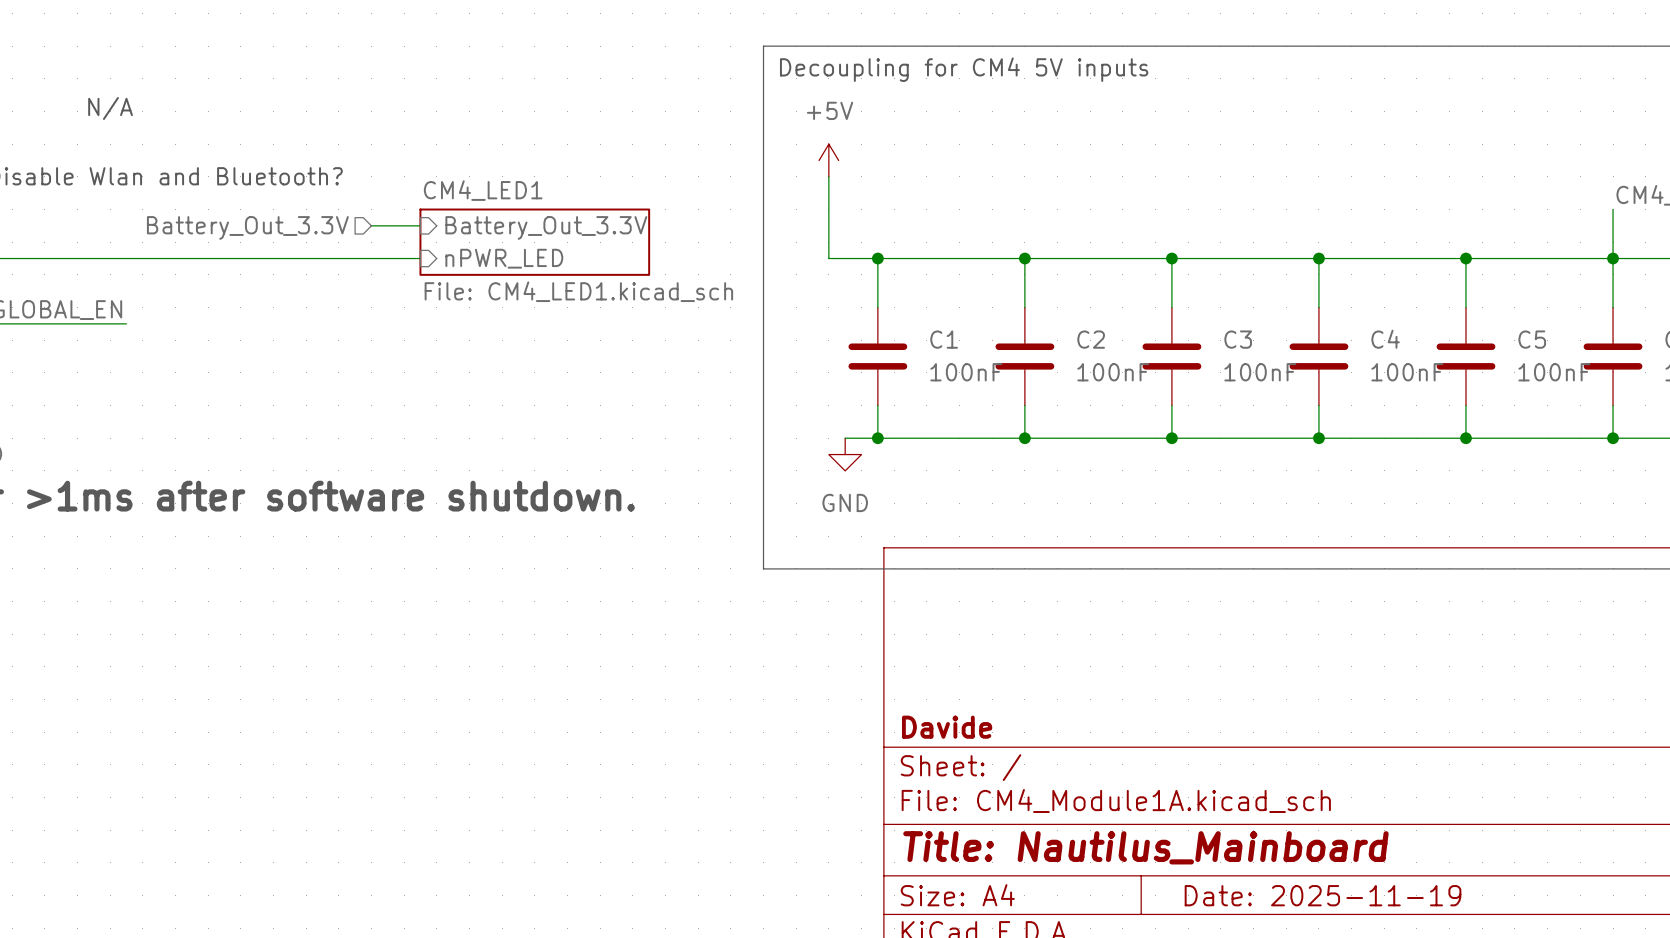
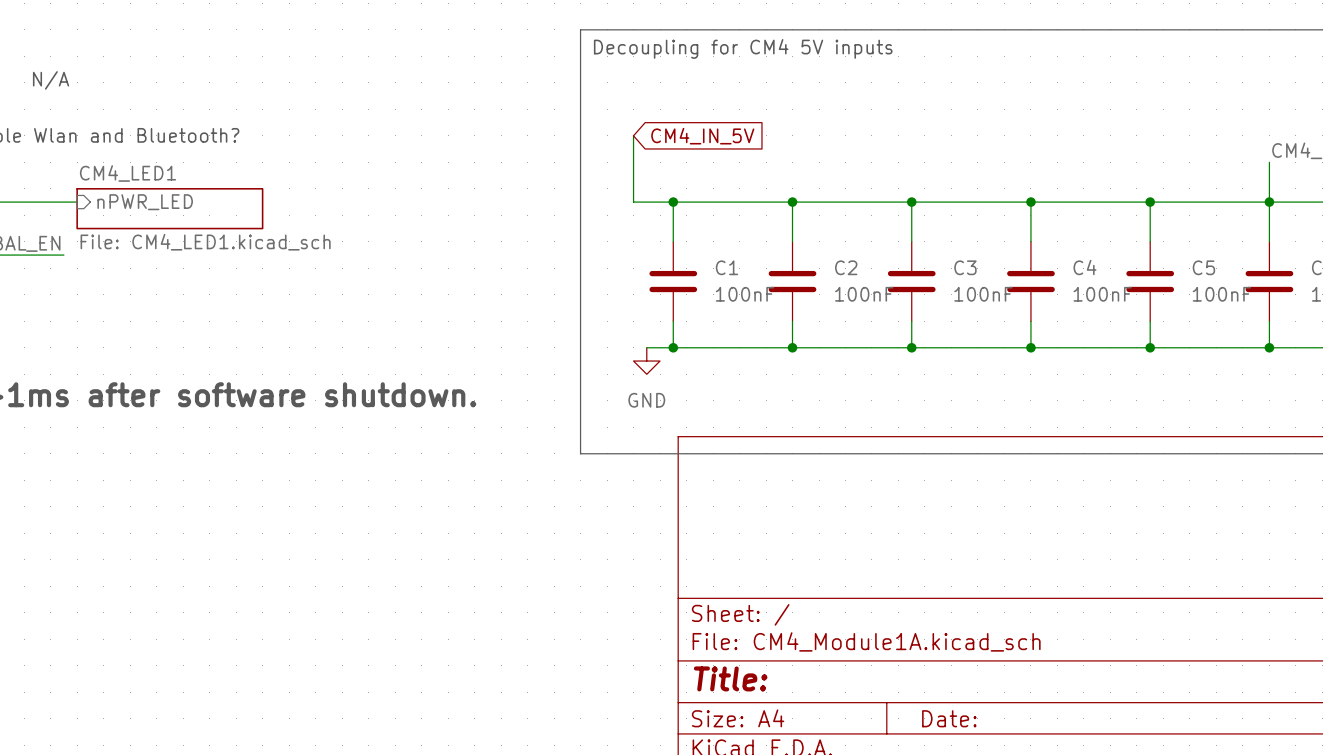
power symbol: +5V (828, 160) -> none
global label: none -> CM4_IN_5V (702, 136)
sheet CM4_LED1 shape: [419, 208, 651, 276] -> [76, 188, 264, 230]
wire: (371, 225) (420, 225) -> none
hierarchical label: Battery_Out_3.3V (247, 227) -> none
sheet pin: Battery_Out_3.3V (546, 227) -> none
wire: (142, 258) (420, 258) -> none
sheet pin position: nPWR_LED (504, 258) -> nPWR_LED (145, 202)
title block: Davide (947, 727) -> none
title block: Title: Nautilus_Mainboard (1145, 847) -> Title: (730, 678)
title block: Date: 2025-11-19 (1323, 895) -> Date: (949, 718)

